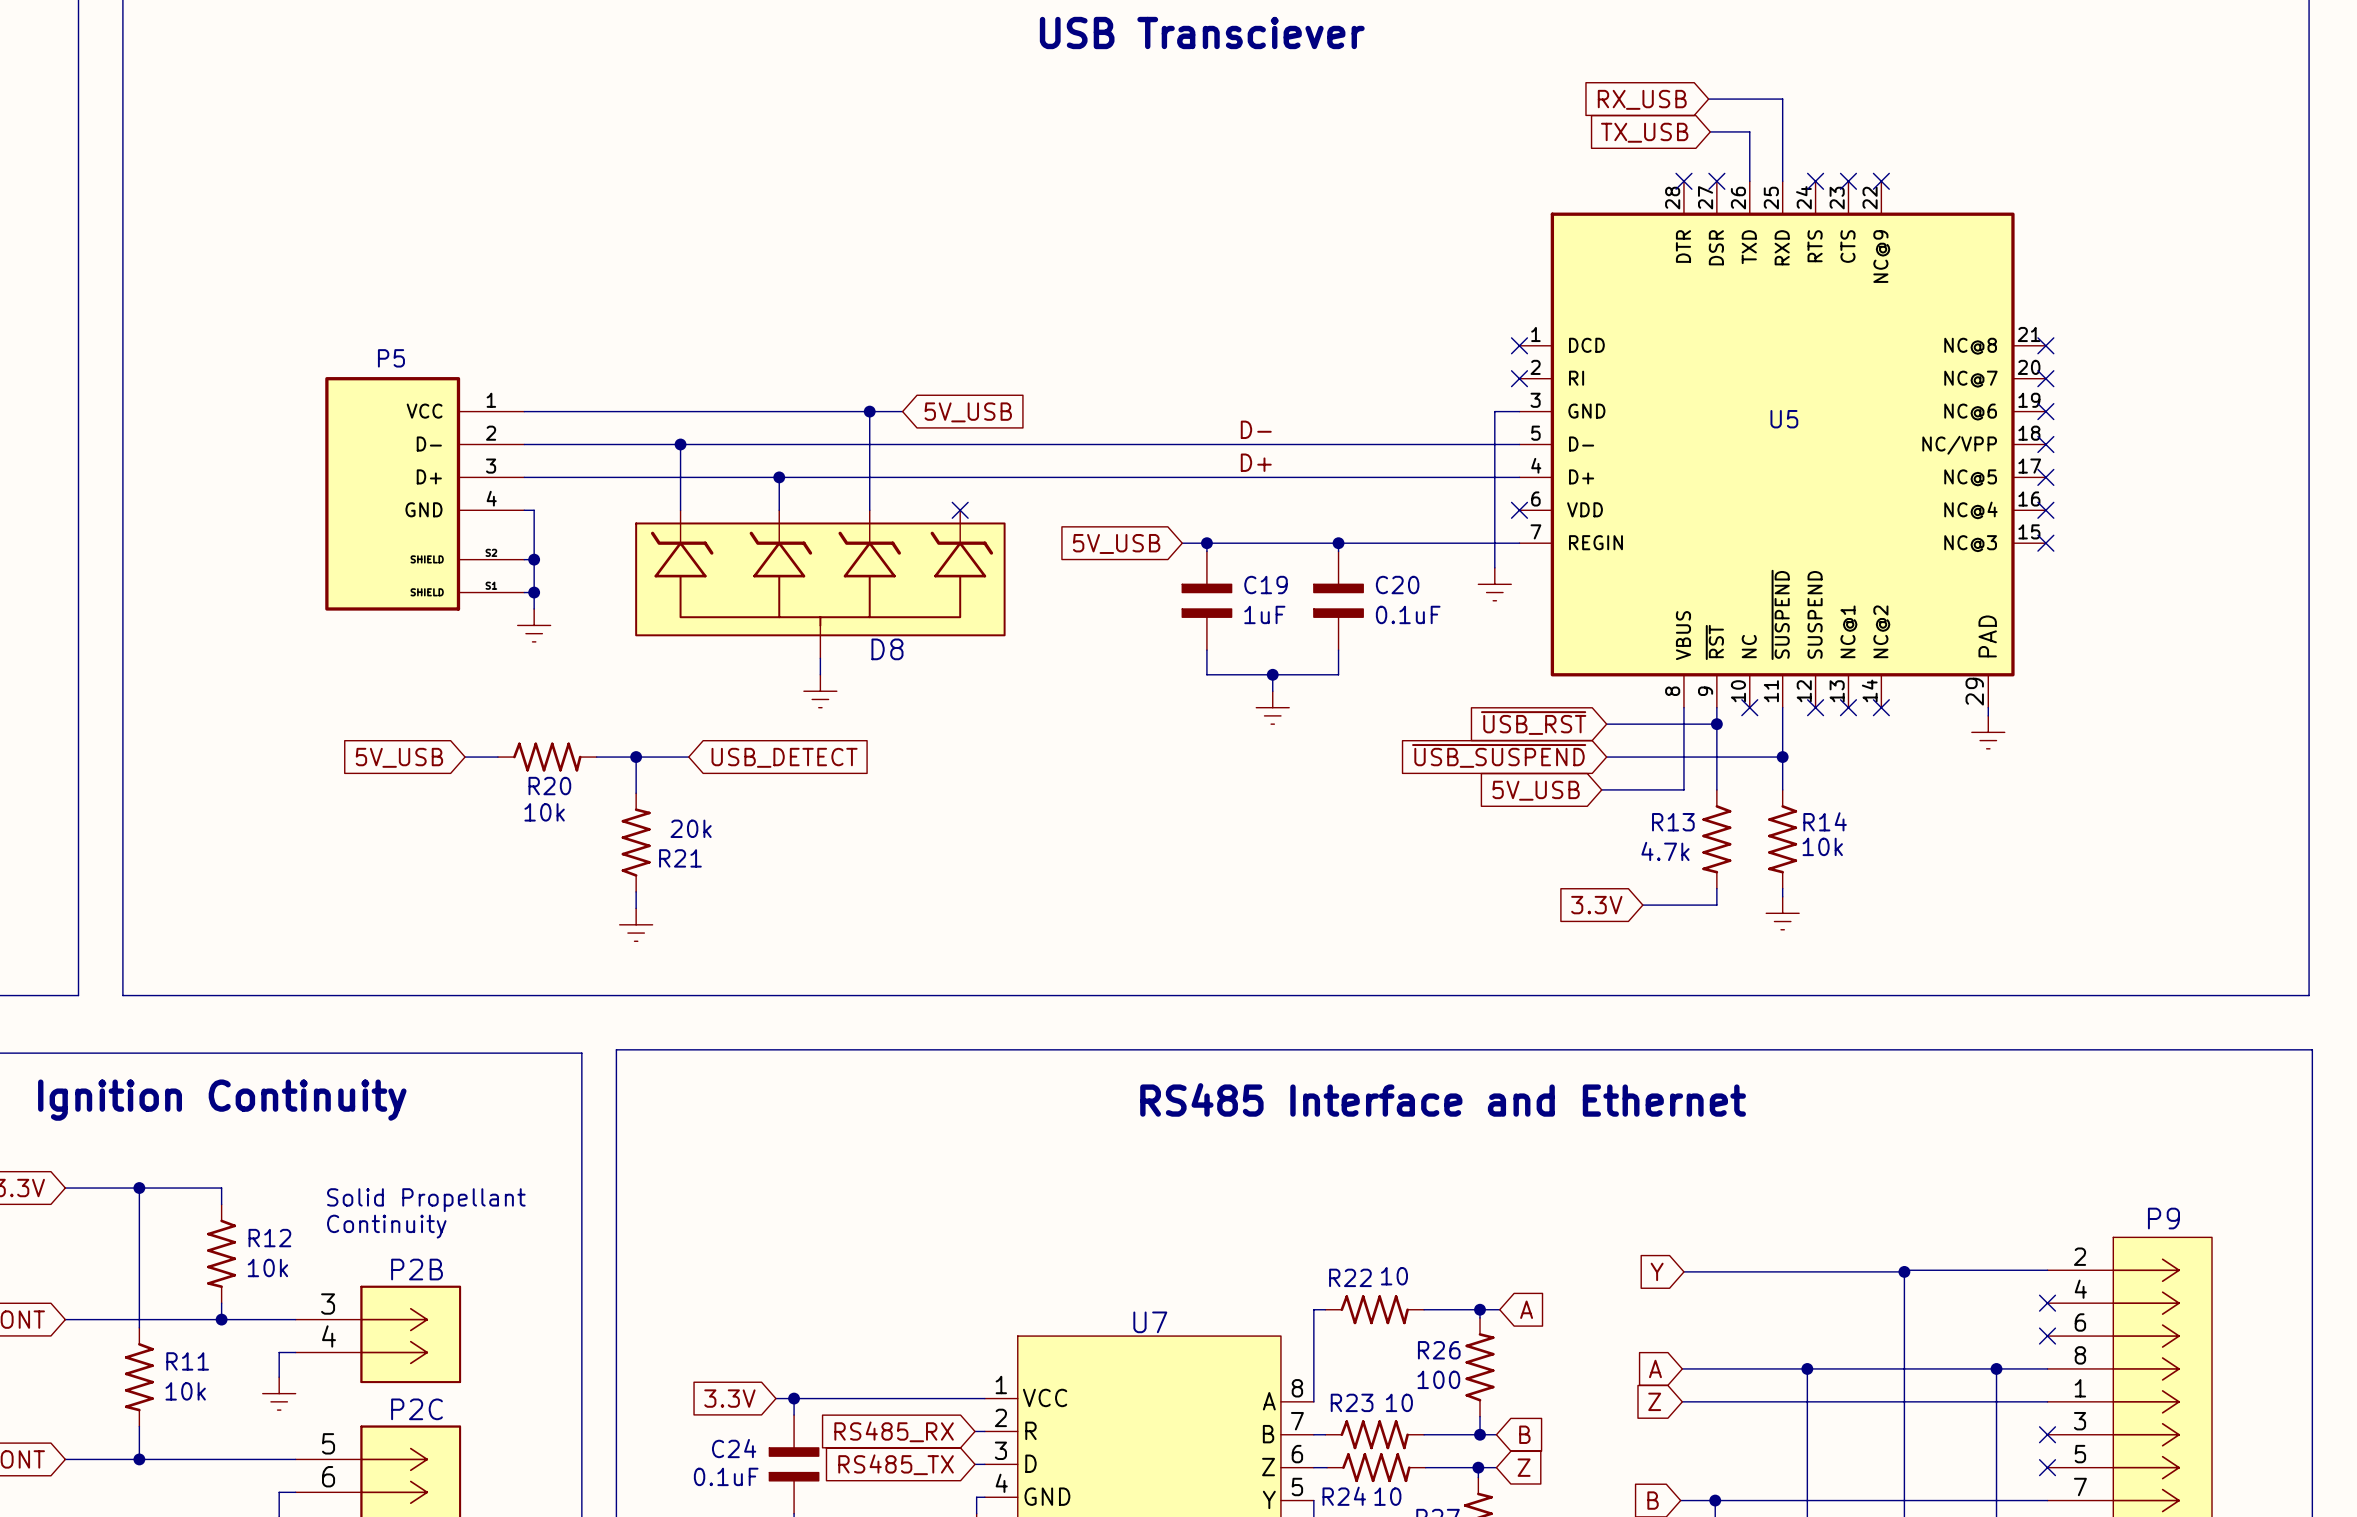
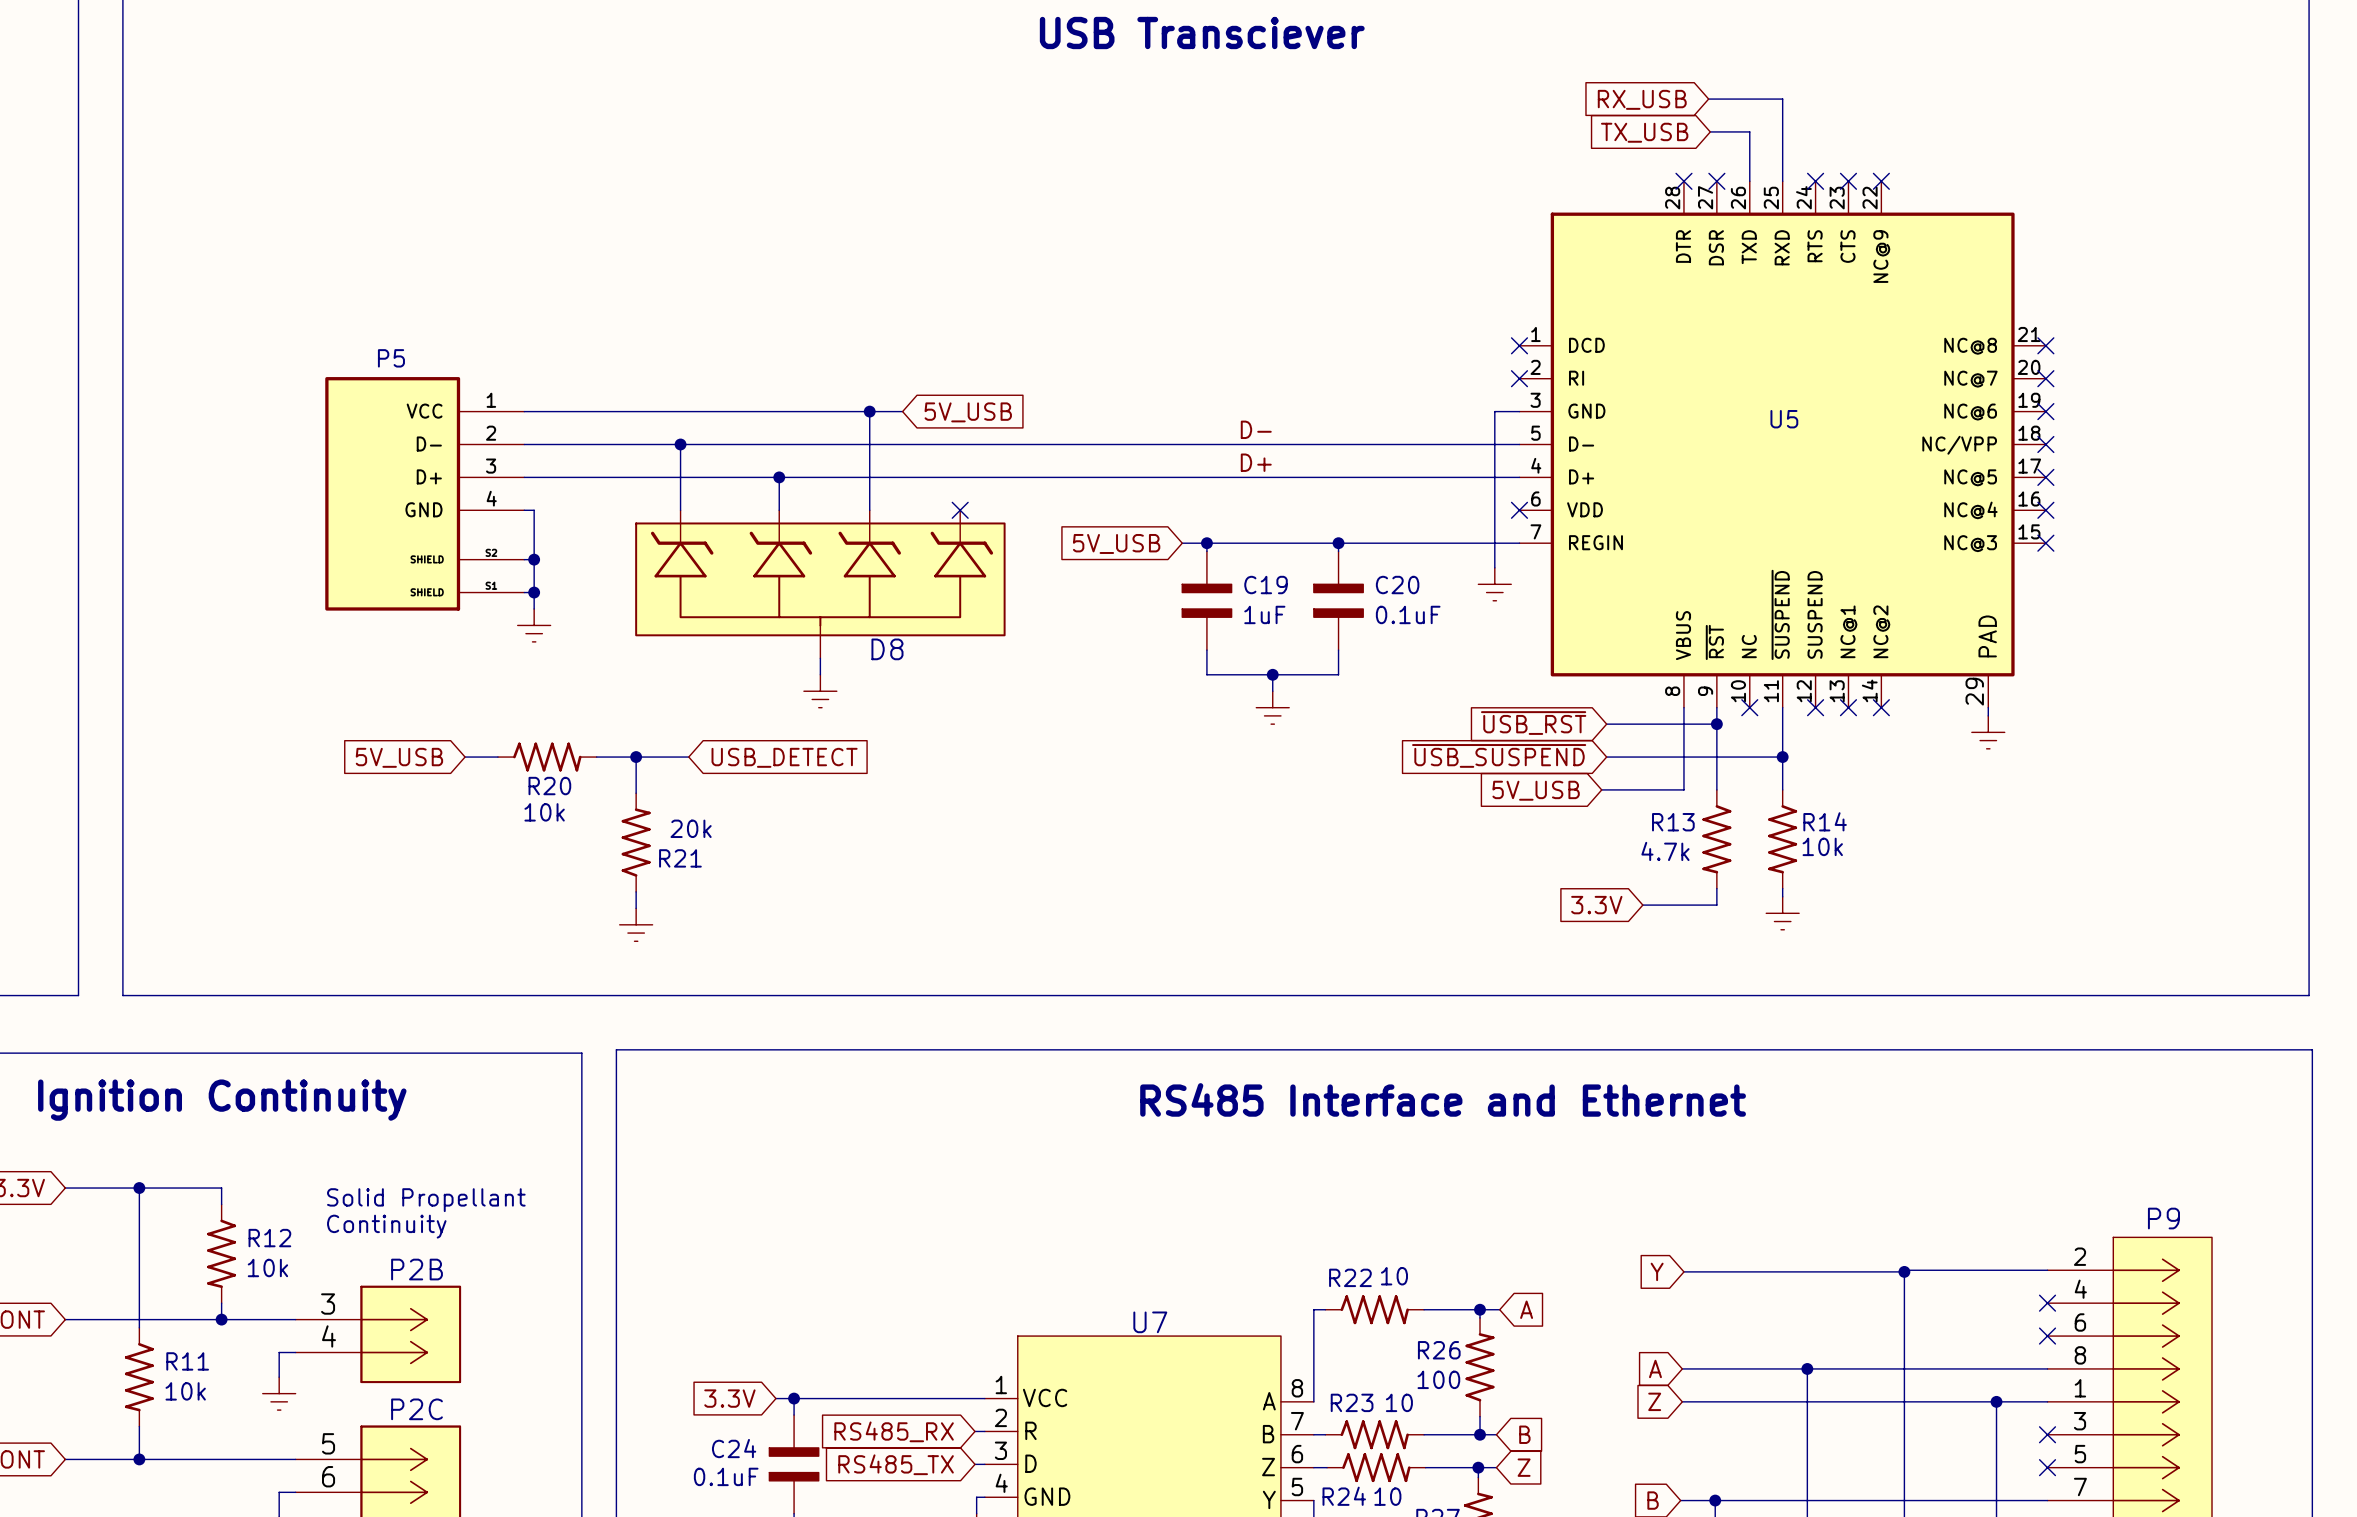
wire: (1996, 1368) (1996, 1401) -> none
junction position: (1996, 1368) -> (1996, 1401)

